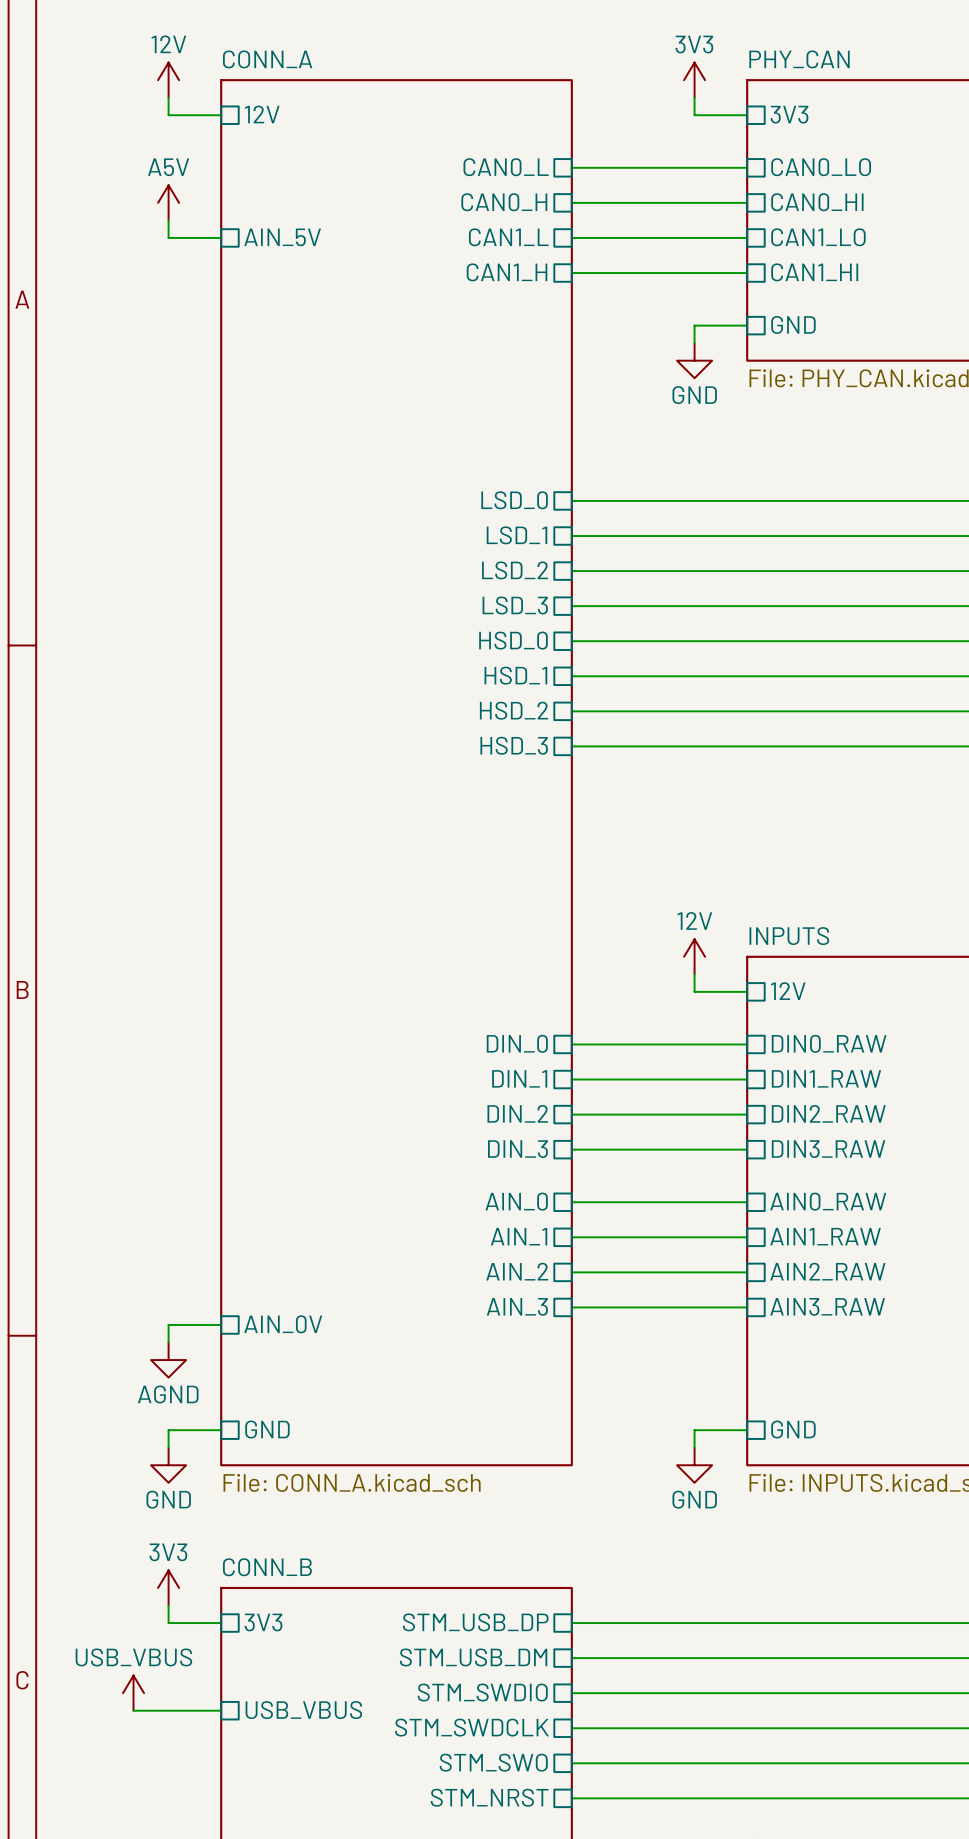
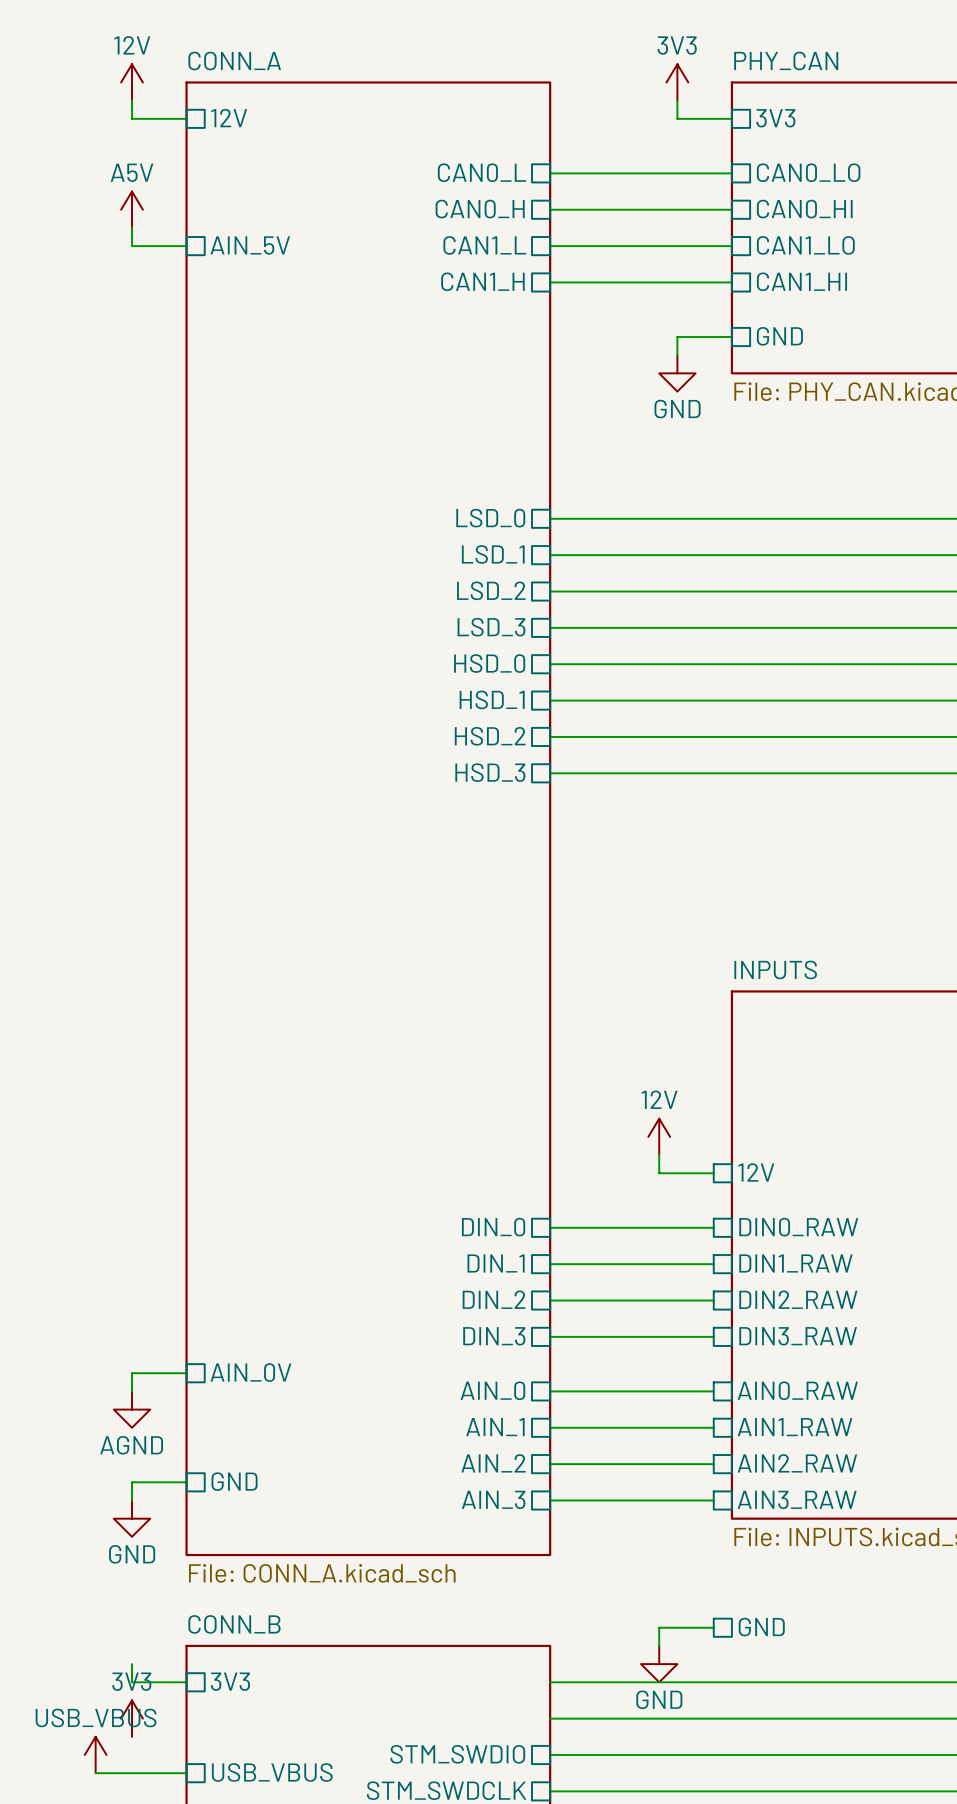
sheet CONN_A: File: CONN_A.kicad_sch (396, 772) -> none
sheet CONN_A: none -> File: CONN_A.kicad_sch (368, 818)
power symbol position: 12V (694, 956) -> 12V (659, 1136)
wire: (694, 974) (694, 991) (747, 991) -> (659, 1155) (659, 1173) (713, 1173)
sheet pin position: 12V (788, 991) -> 12V (756, 1172)
sheet pin position: DIN_0 (517, 1043) -> DIN_0 (493, 1227)
sheet pin position: DIN0_RAW (829, 1043) -> DIN0_RAW (798, 1227)
wire: (571, 1044) (747, 1044) -> none
sheet pin position: DIN_1 (519, 1078) -> DIN_1 (496, 1263)
sheet pin position: DIN1_RAW (826, 1078) -> DIN1_RAW (795, 1263)
wire: (571, 1079) (747, 1079) -> none
sheet pin position: DIN_2 (517, 1113) -> DIN_2 (494, 1299)
sheet pin position: DIN2_RAW (828, 1113) -> DIN2_RAW (798, 1299)
wire: (571, 1114) (747, 1114) -> none
sheet pin position: DIN_3 (517, 1149) -> DIN_3 (494, 1336)
wire: (571, 1149) (747, 1149) -> none
sheet pin position: DIN3_RAW (828, 1149) -> DIN3_RAW (798, 1336)
wire: none -> (550, 1227) (713, 1227)
sheet pin position: AIN_0 (516, 1201) -> AIN_0 (492, 1390)
sheet pin position: AIN0_RAW (828, 1201) -> AIN0_RAW (797, 1390)
wire: (571, 1202) (747, 1202) -> none
wire: none -> (550, 1264) (713, 1264)
sheet pin position: AIN_1 (519, 1236) -> AIN_1 (495, 1427)
sheet pin position: AIN1_RAW (825, 1236) -> AIN1_RAW (795, 1427)
wire: (571, 1237) (747, 1237) -> none
wire: none -> (550, 1300) (713, 1300)
sheet pin position: AIN_2 (517, 1271) -> AIN_2 (493, 1463)
sheet pin position: AIN2_RAW (827, 1271) -> AIN2_RAW (797, 1463)
wire: (571, 1272) (747, 1272) -> none
wire: none -> (550, 1336) (713, 1336)
sheet pin position: AIN_3 (517, 1306) -> AIN_3 (493, 1499)
sheet pin position: AIN3_RAW (827, 1306) -> AIN3_RAW (797, 1499)
wire: (571, 1307) (747, 1307) -> none
wire: none -> (550, 1391) (713, 1391)
wire: none -> (550, 1427) (713, 1427)
wire: none -> (550, 1464) (713, 1464)
sheet pin position: GND (793, 1429) -> GND (761, 1627)
wire: (747, 1430) (694, 1430) (694, 1447) -> (713, 1627) (659, 1627) (659, 1645)
wire: none -> (550, 1500) (713, 1500)
power symbol position: GND (694, 1465) -> GND (659, 1664)
power symbol position: 3V3 (168, 1587) -> 3V3 (132, 1718)
sheet pin: STM_USB_DP (475, 1622) -> none
sheet pin: STM_USB_DM (473, 1657) -> none

